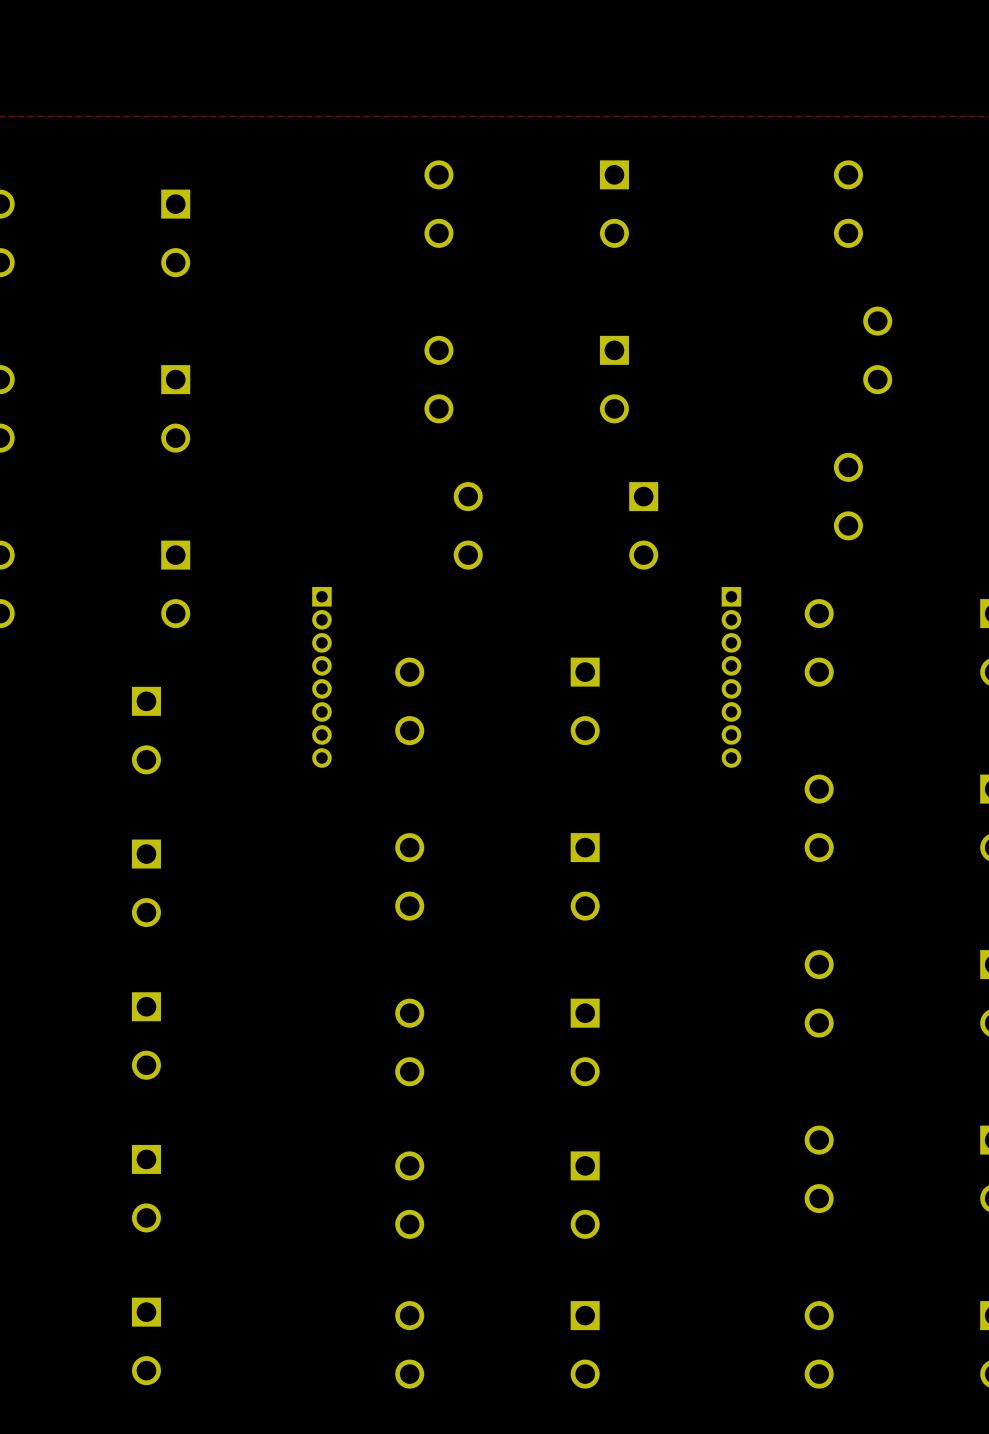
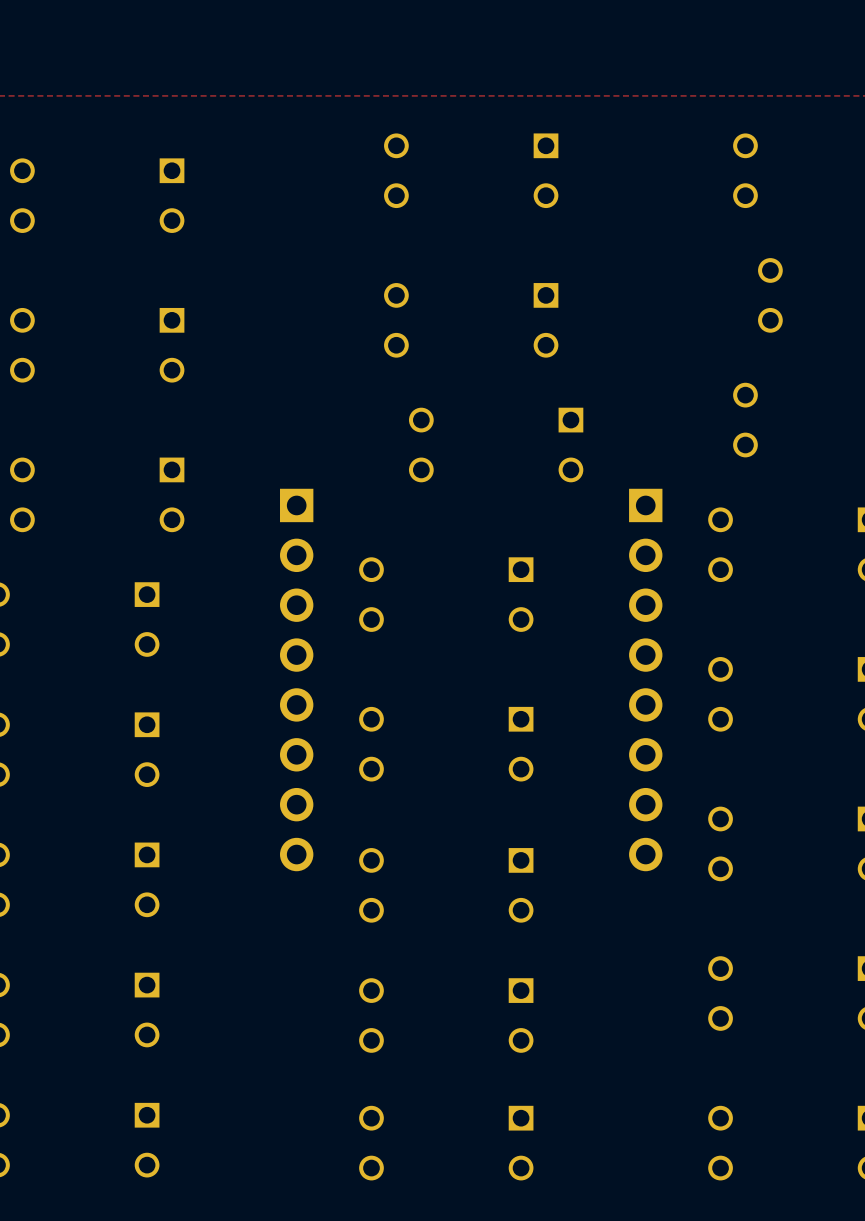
part: (321, 677) -> none
part: (731, 677) -> none
part: none -> (296, 680)
part: none -> (645, 680)

